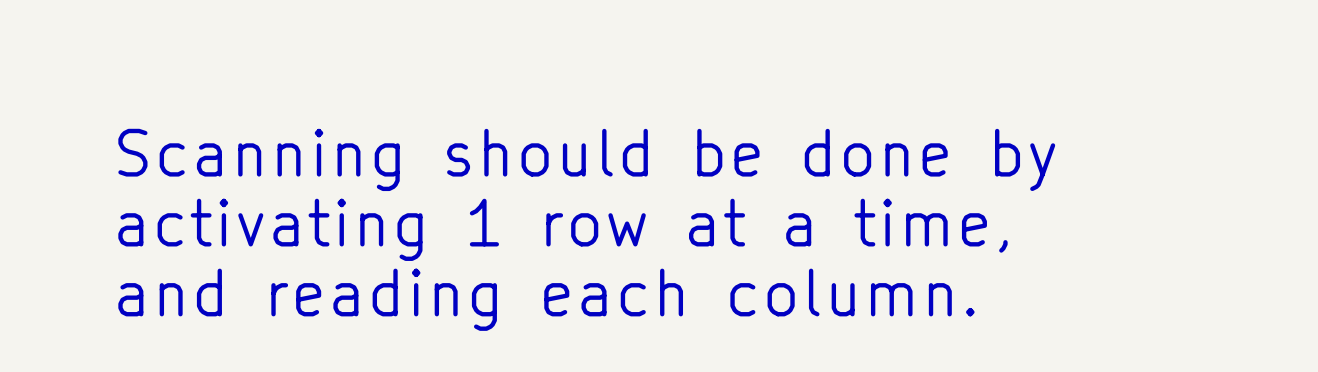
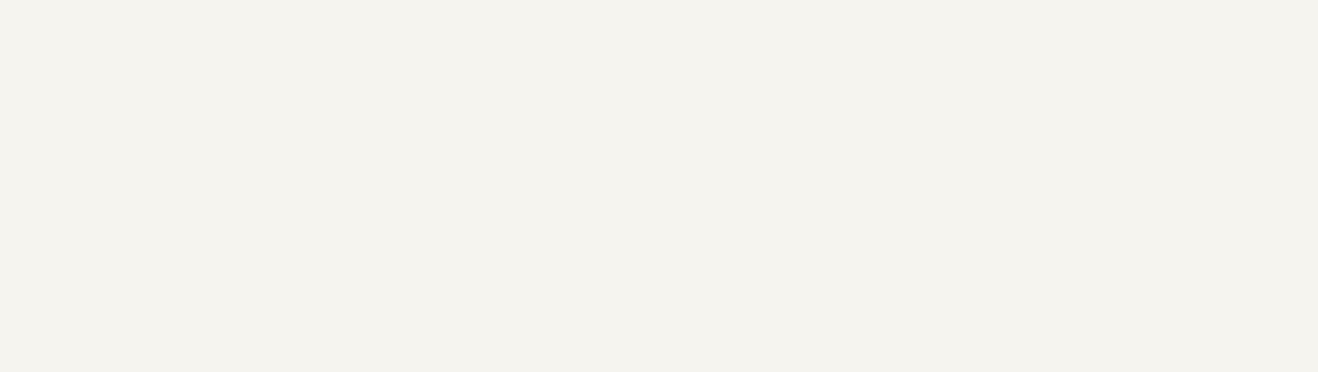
text: Scanning should be done by (586, 159) -> none
text: activating 1 row at a time, (562, 229) -> none
text: and reading each column. (546, 299) -> none

